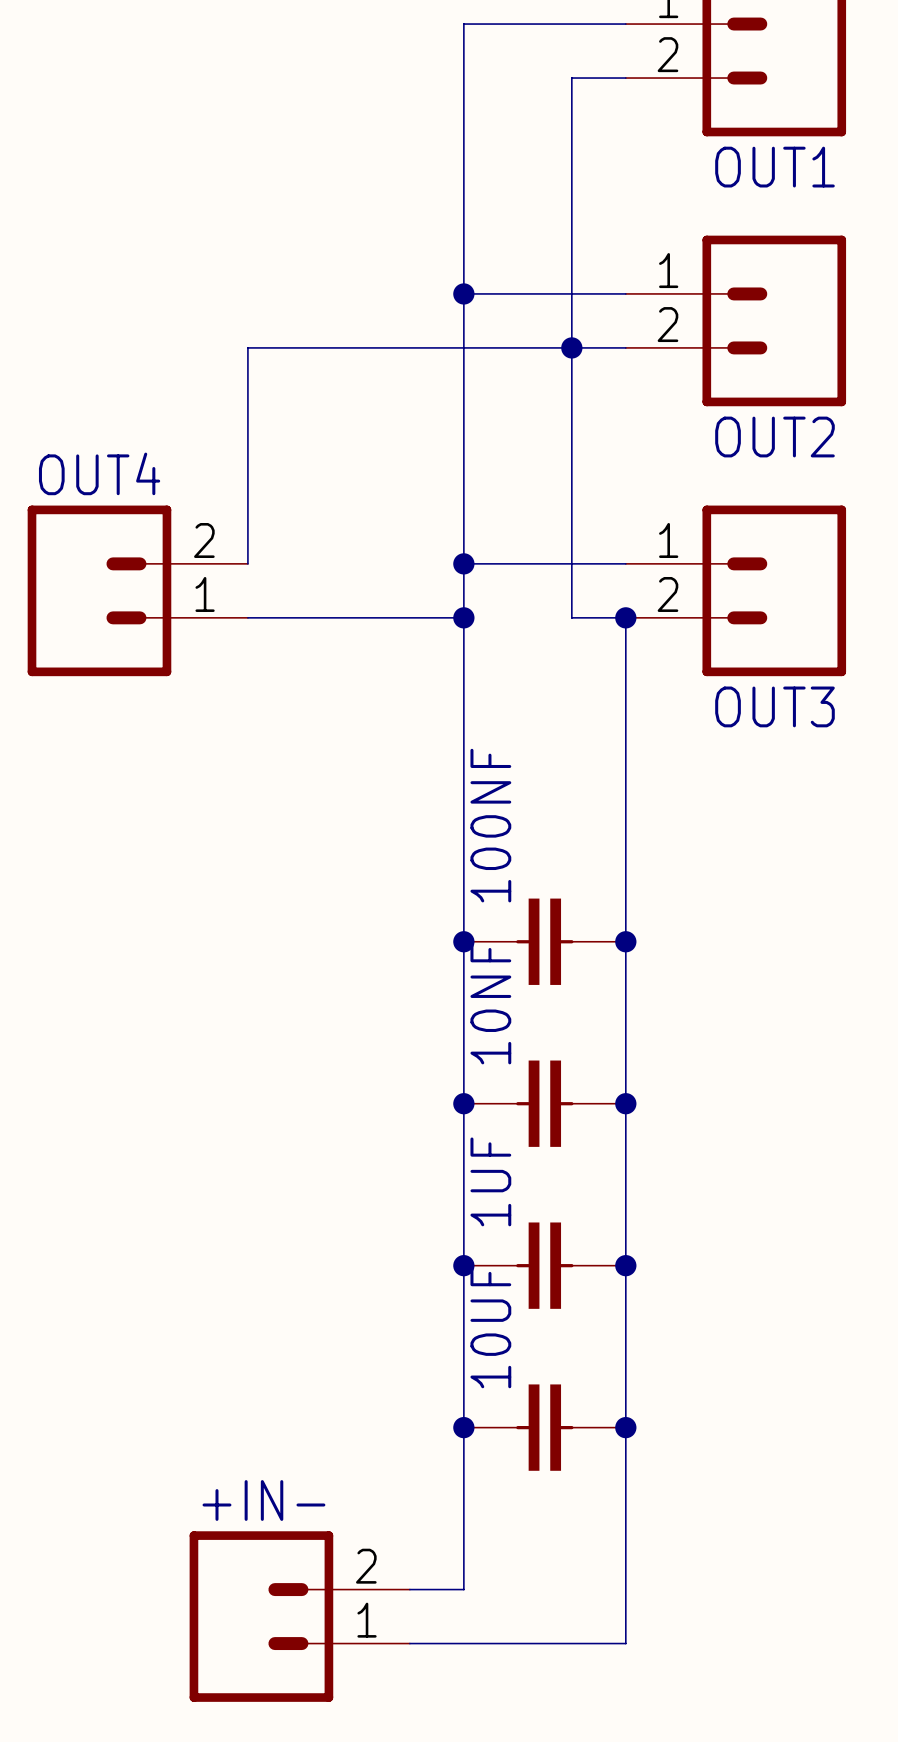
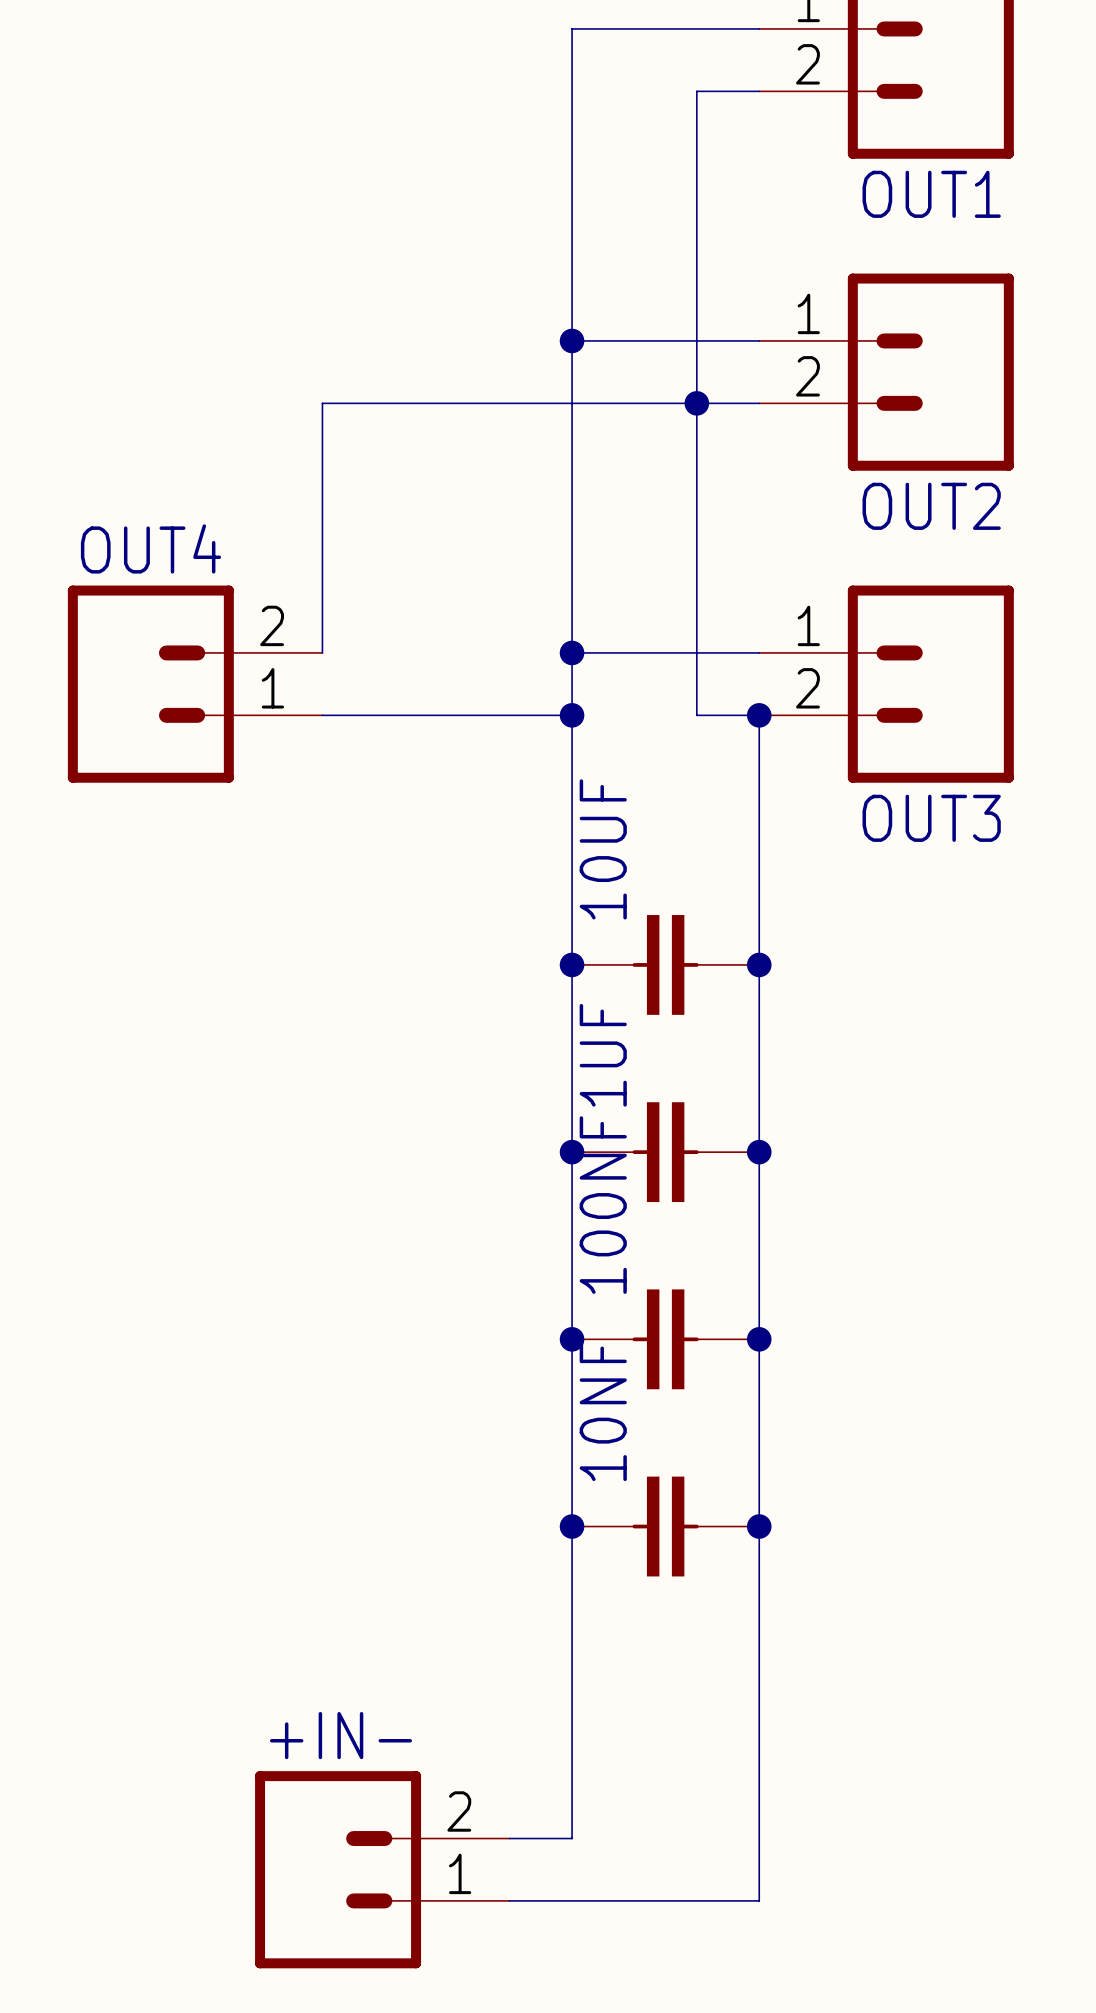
junction: none -> (572, 964)
junction: none -> (759, 964)
junction: (463, 941) -> none
100NF position: (544, 941) -> (665, 1339)
junction: (625, 941) -> none
junction: none -> (572, 1152)
junction: none -> (759, 1152)
junction: (463, 1103) -> none
10NF position: (544, 1103) -> (665, 1526)
junction: (625, 1103) -> none
junction: none -> (572, 1339)
junction: none -> (759, 1339)
junction: (463, 1265) -> none
1UF position: (544, 1265) -> (665, 1152)
junction: (625, 1265) -> none
junction: none -> (572, 1526)
junction: none -> (759, 1526)
junction: (463, 1427) -> none
10UF position: (544, 1427) -> (665, 964)
junction: (625, 1427) -> none

